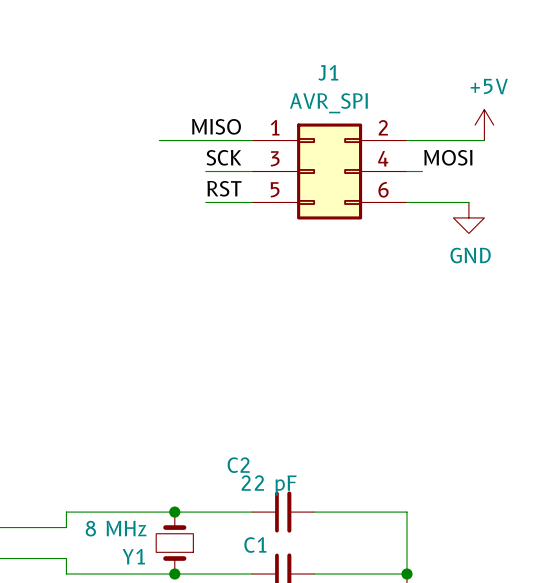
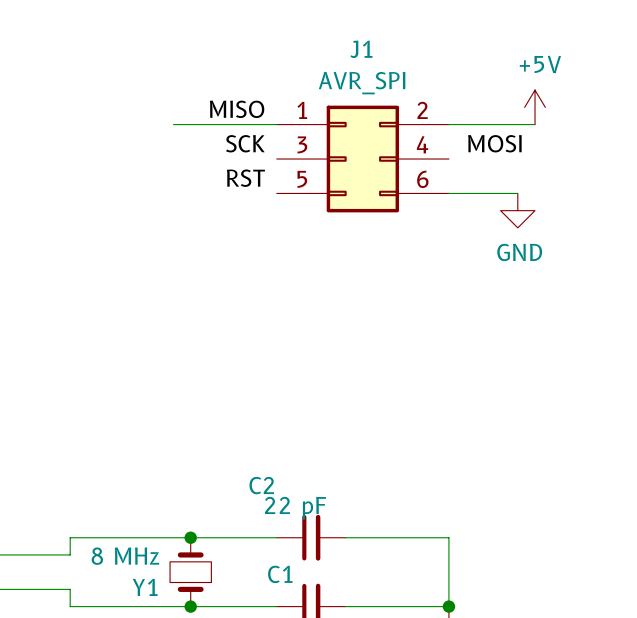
wire: (205, 171) (252, 171) -> none
wire: (406, 171) (422, 171) -> none
wire: (205, 202) (252, 202) -> none

